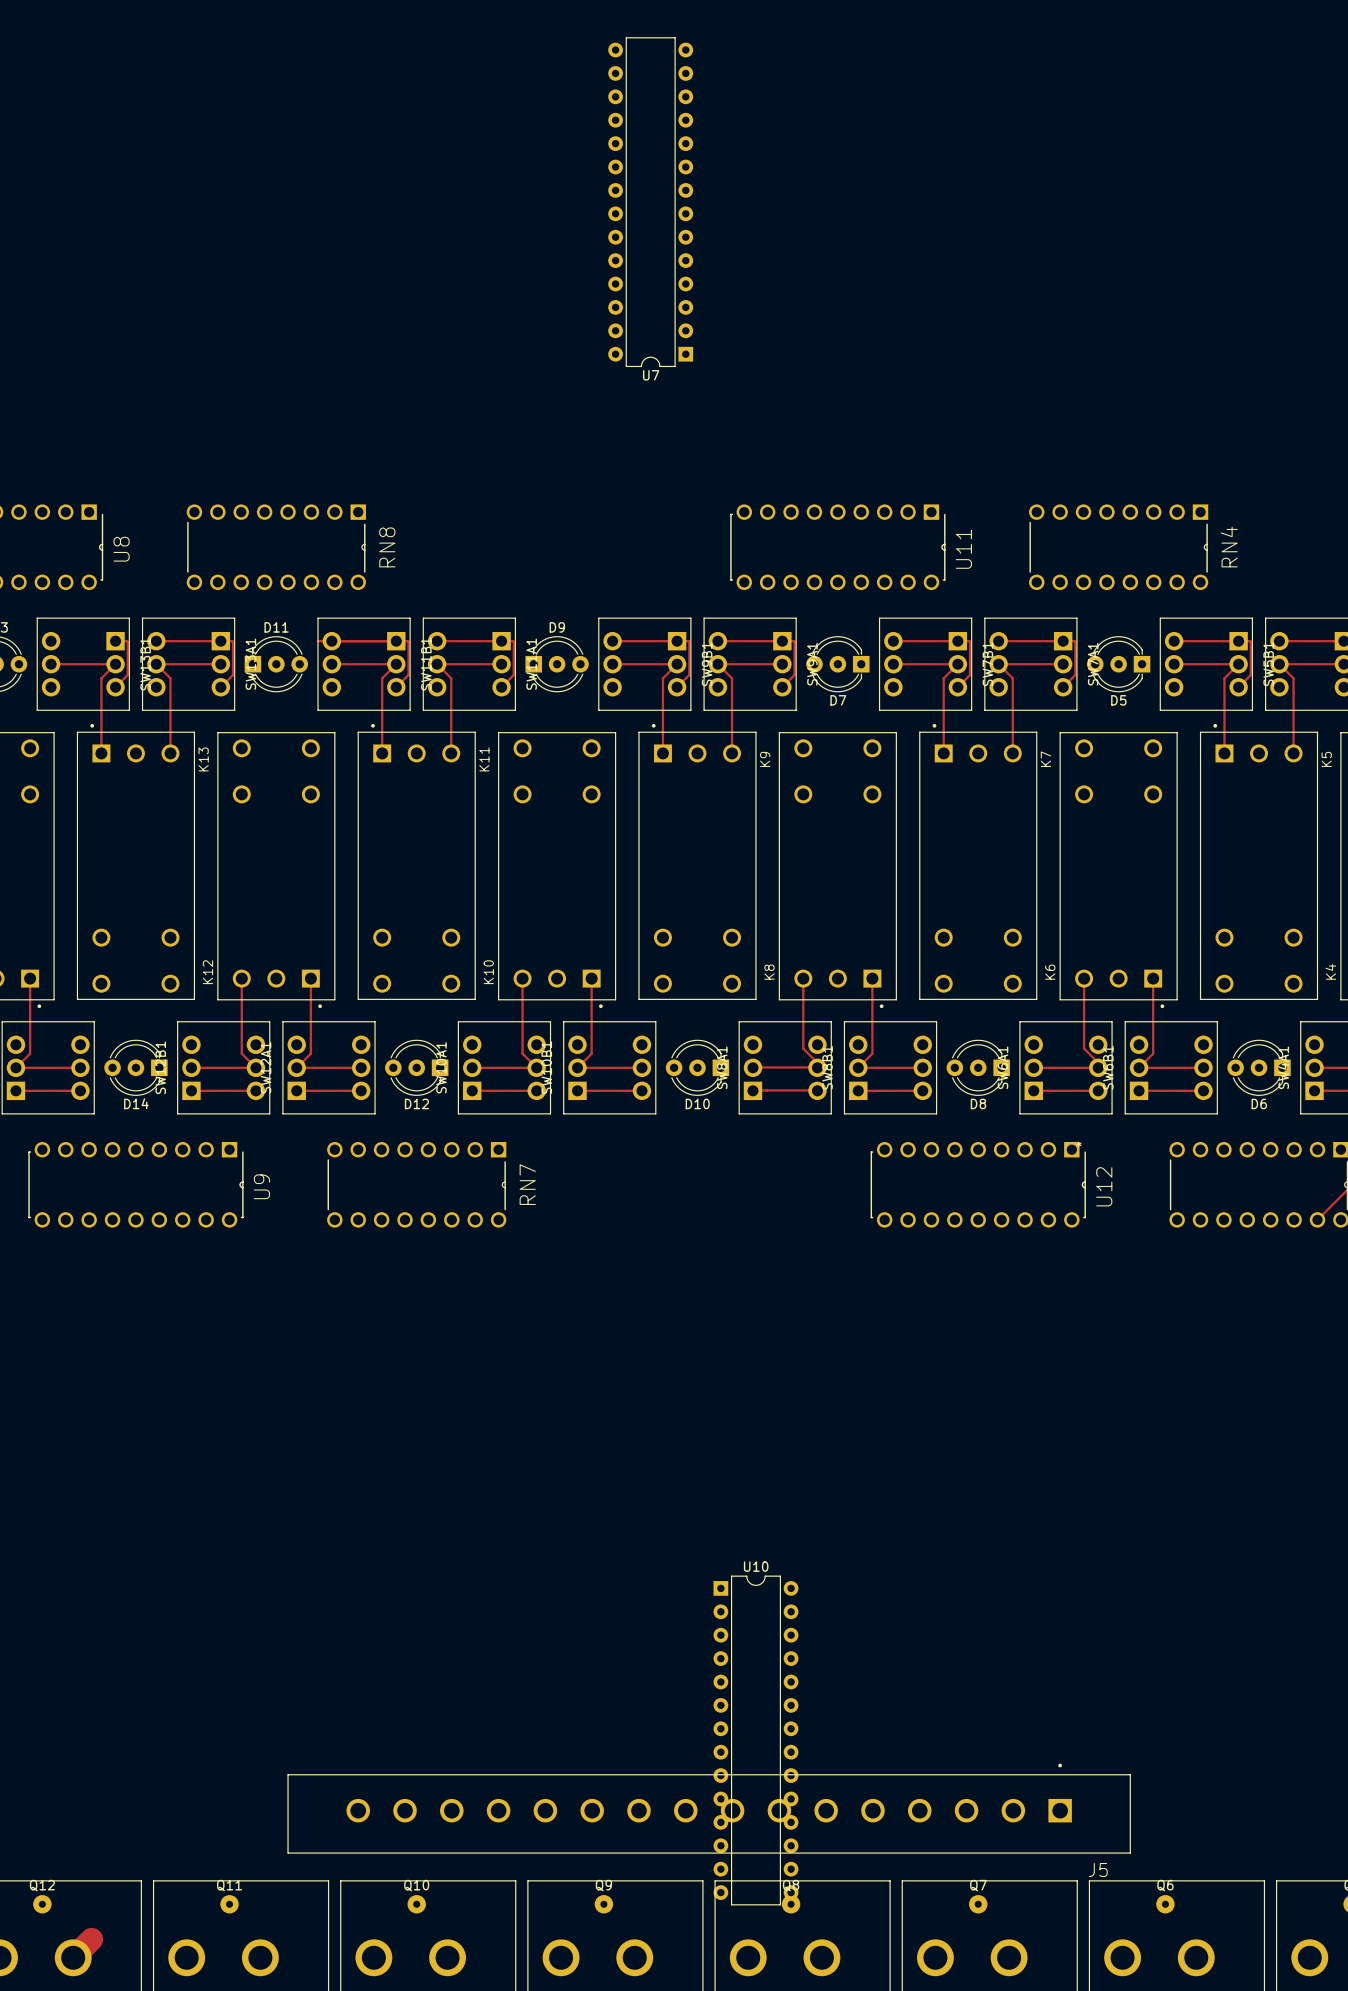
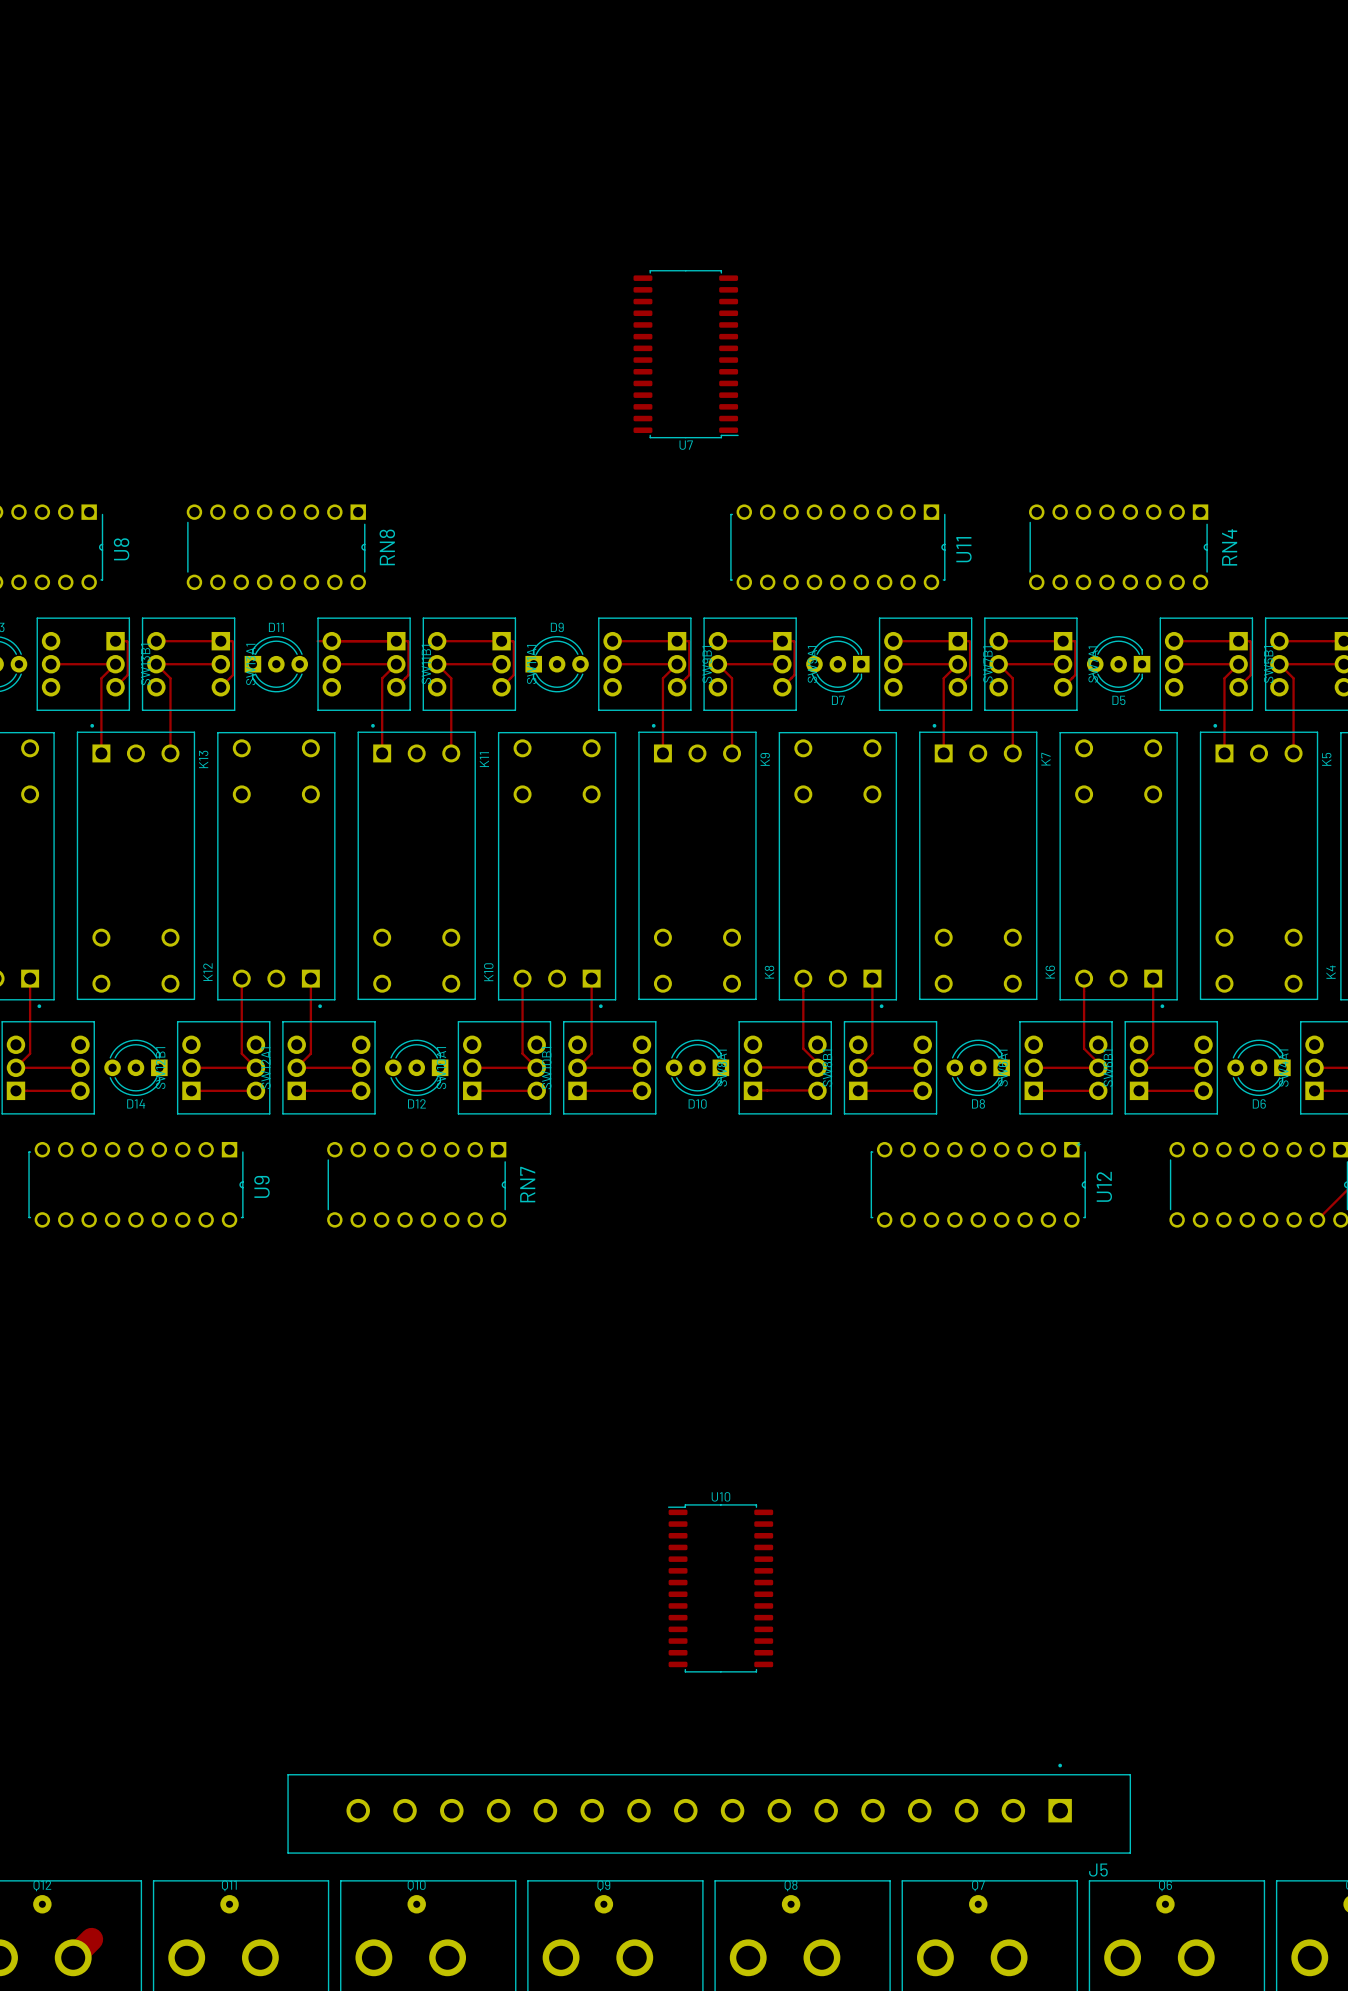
U7 footprint: [608, 37, 694, 368] -> [633, 270, 739, 439]
U7 name position: U7 (651, 375) -> U7 (686, 445)
U10 name position: U10 (756, 1566) -> U10 (720, 1496)
U10 footprint: [713, 1575, 799, 1906] -> [668, 1504, 774, 1673]

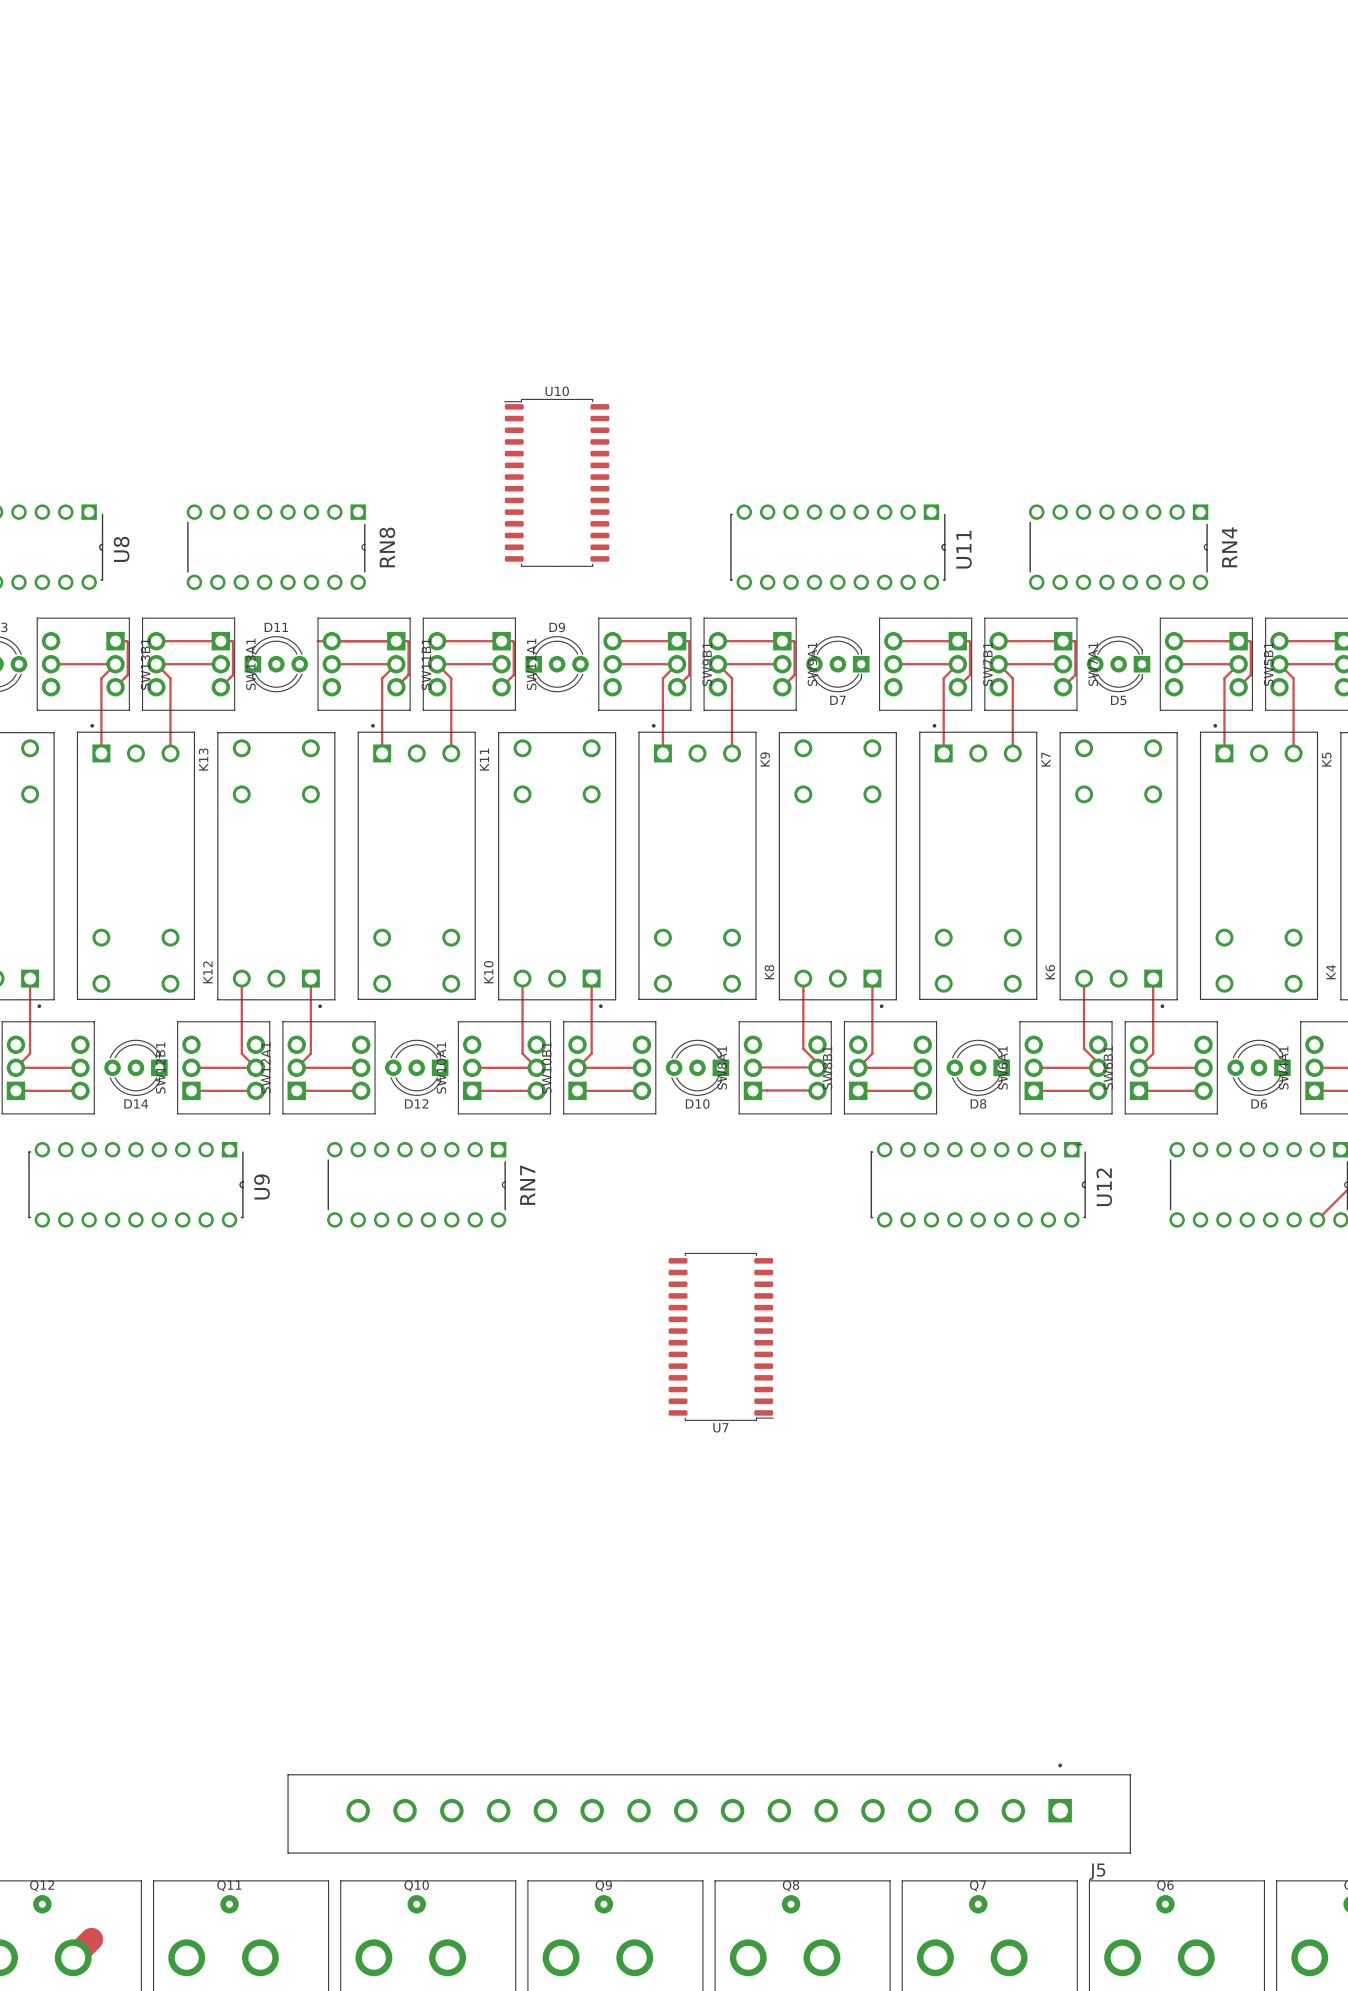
U7 position: (686, 354) -> (721, 1336)
U10 position: (720, 1588) -> (556, 482)

